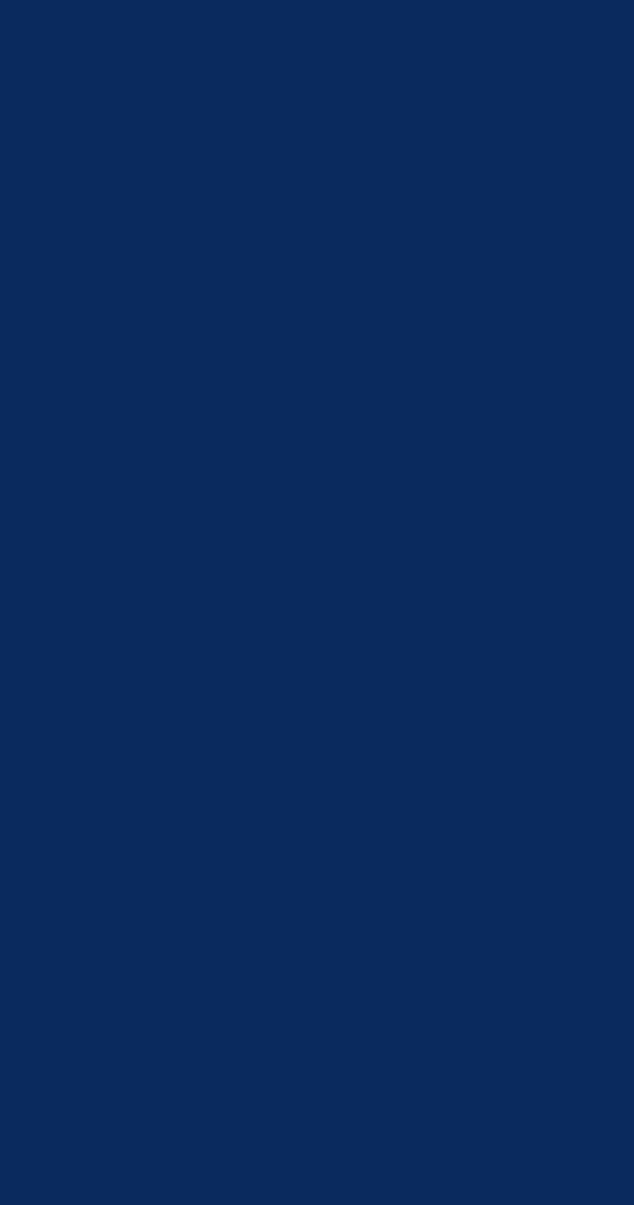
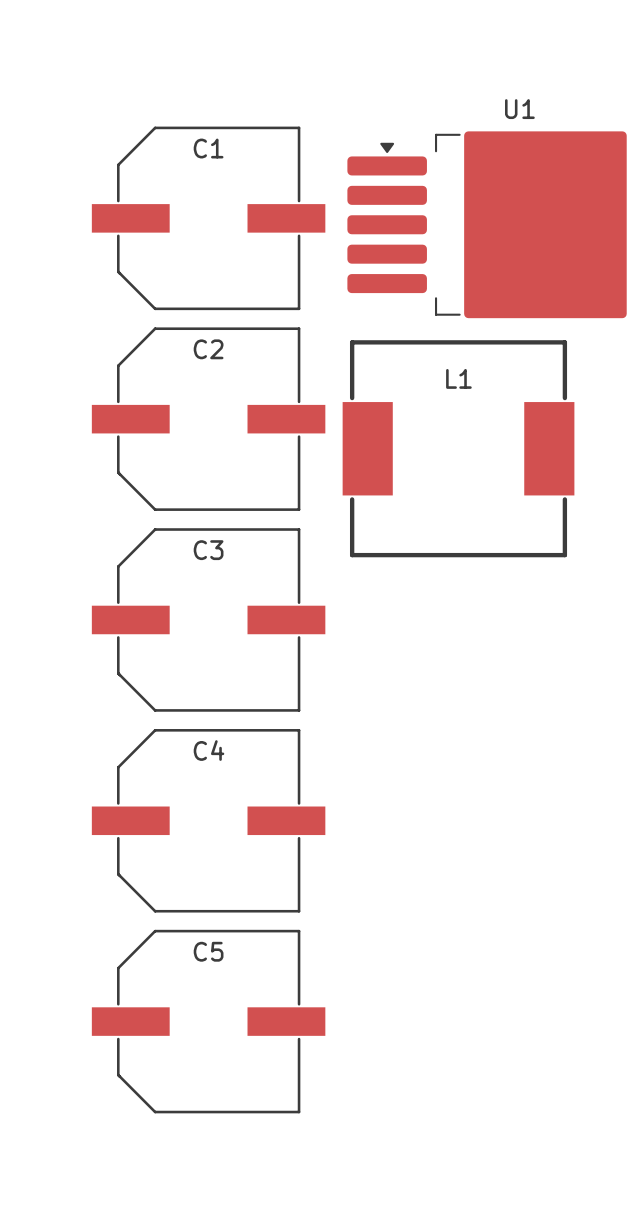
C1: none -> (208, 218)
U1: none -> (487, 224)
C2: none -> (208, 419)
L1: none -> (458, 448)
C3: none -> (208, 619)
C4: none -> (208, 820)
C5: none -> (208, 1021)

